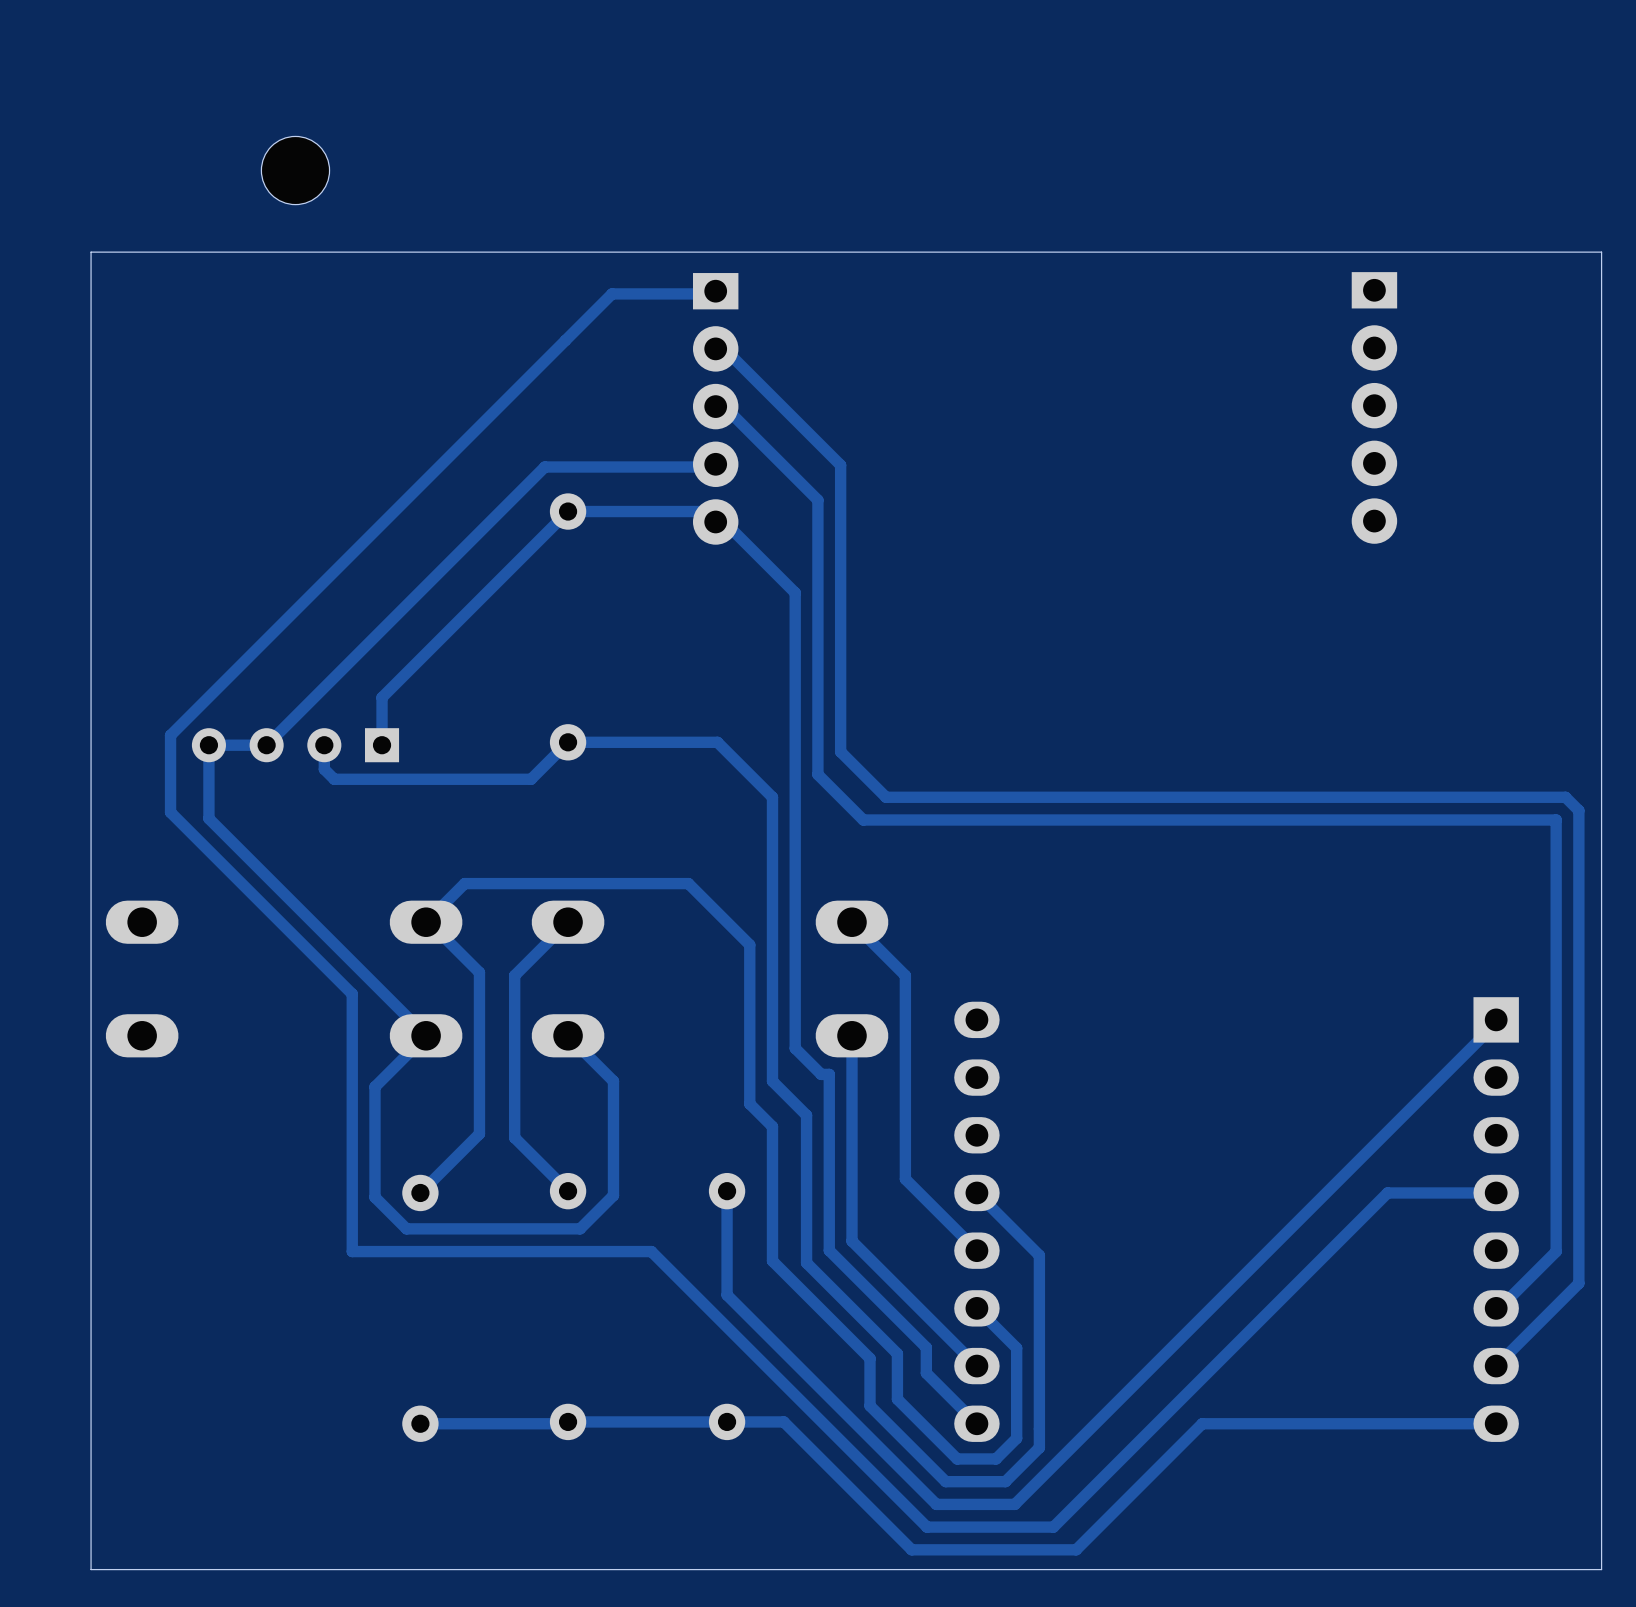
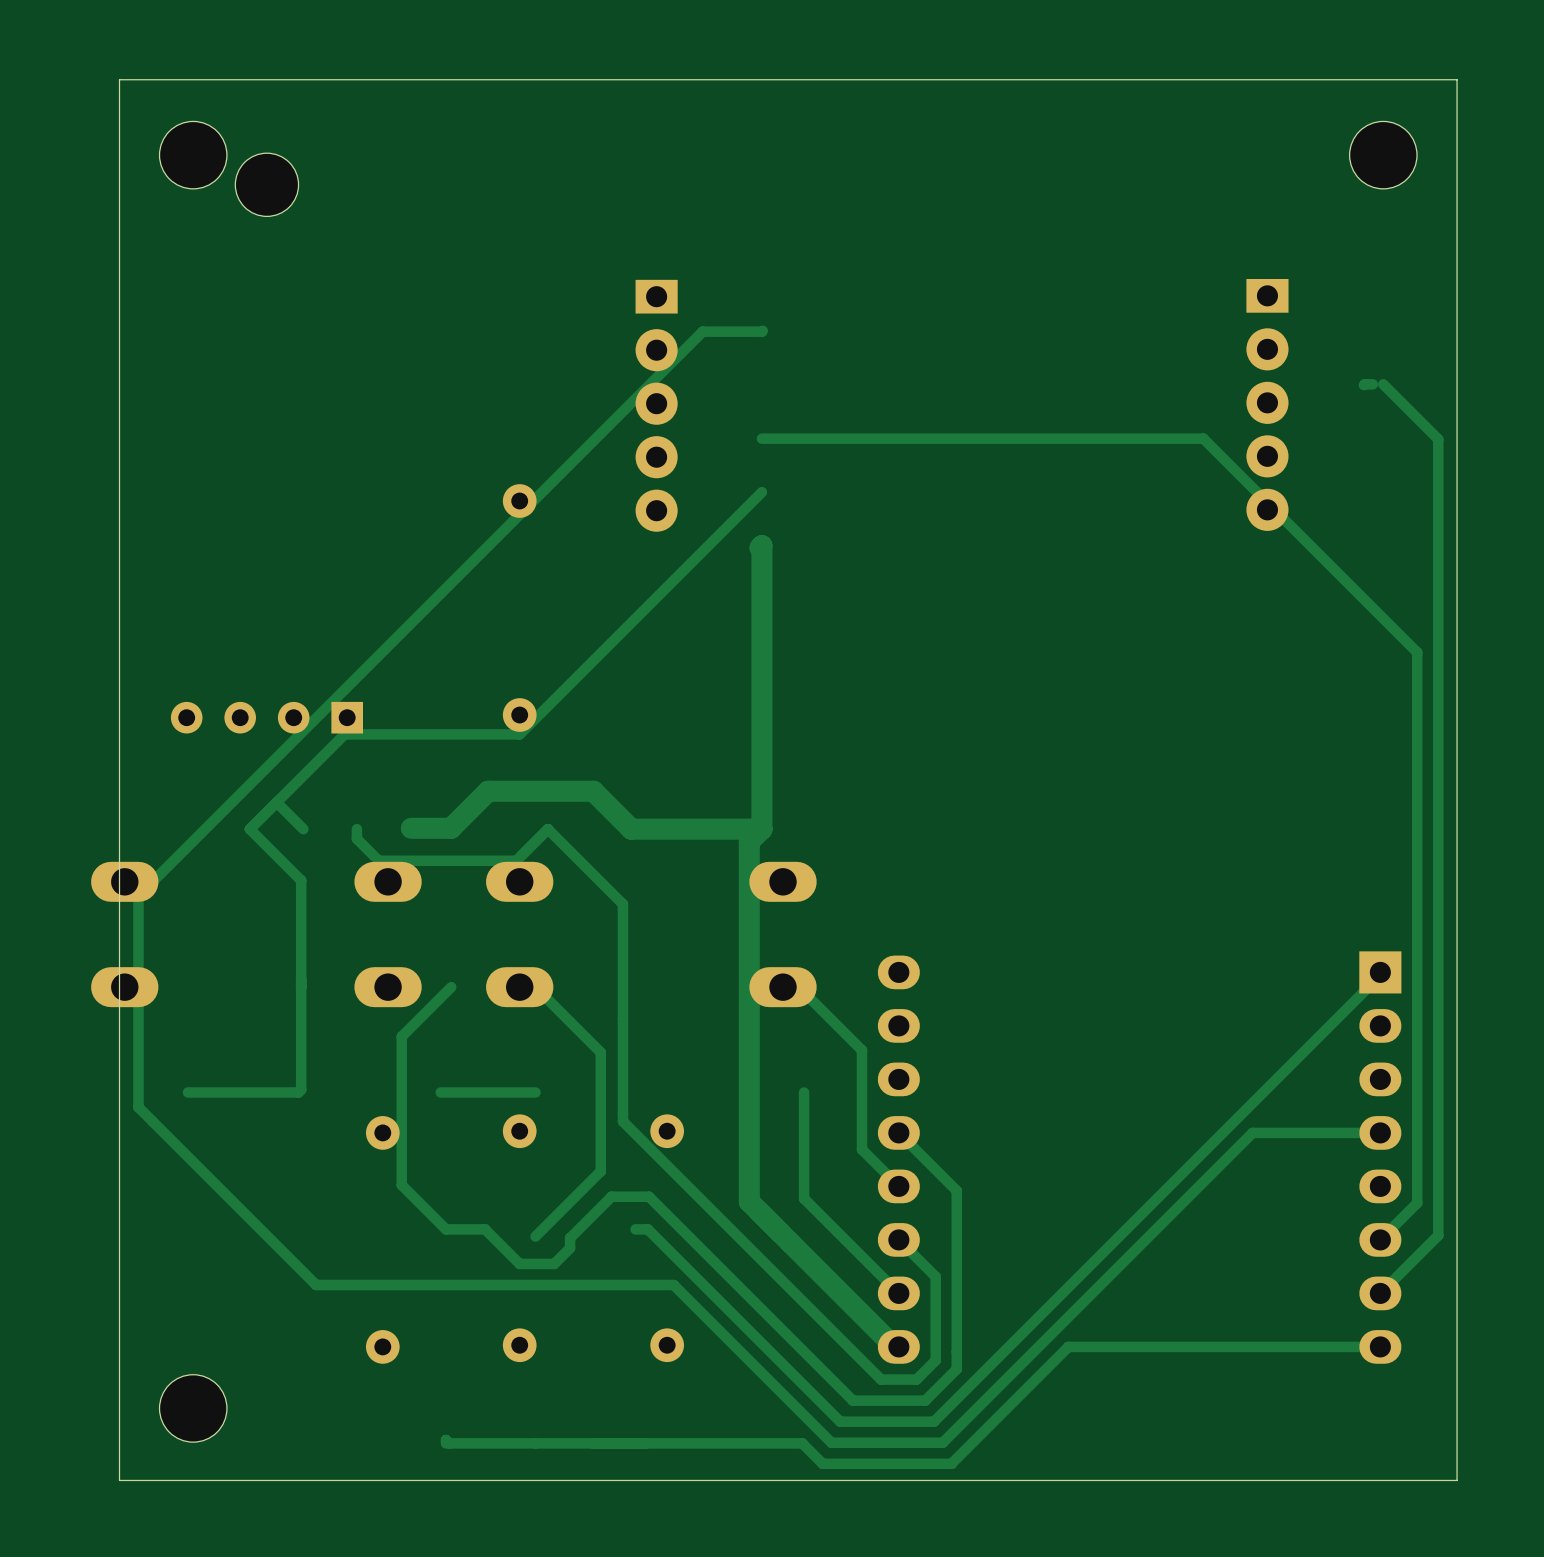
part: none -> (193, 155)
part: none -> (1383, 155)
board edge: (1601, 252) (91, 252) (91, 1569) (1601, 1569) (1601, 252) -> (1457, 79) (1457, 1480) (119, 1480) (119, 79) (1457, 79)
track: (727, 293) (612, 293) (170, 735) (170, 812) (352, 994) (352, 1251) (651, 1251) (926, 1527) -> (762, 330) (702, 331) (138, 895) (138, 1107) (316, 1285) (673, 1285) (831, 1442) (852, 1442)
track: (727, 351) (840, 465) (840, 751) (886, 797) (1565, 797) (1578, 810) (1578, 1283) (1558, 1303) -> (1383, 384) (1438, 439) (1438, 1235)
track: none -> (1372, 384) (1363, 385)
track: (727, 409) (817, 500) (817, 774) (863, 820) (1556, 820) (1556, 1251) (1499, 1308) -> none
track: none -> (761, 438) (1203, 438) (1417, 652) (1417, 1203) (1380, 1239)
track: (727, 467) (544, 467) (266, 745) (208, 745) (208, 818) (426, 1035) (374, 1086) (374, 1197) (406, 1228) (580, 1228) (613, 1195) (613, 1081) (568, 1035) -> none
track: none -> (761, 492) (519, 734) (344, 734) (249, 829) (301, 880) (301, 1089) (298, 1092) (187, 1092)
track: none -> (759, 547) (761, 545) (761, 829)
track: (324, 745) (324, 769) (334, 779) (531, 779) (568, 742) (717, 742) (772, 797) (772, 1081) (806, 1115) (806, 1262) (897, 1353) (897, 1399) (957, 1458) -> (356, 829) (356, 838) (378, 860) (516, 860) (547, 829) (622, 904) (622, 1121) (881, 1379)
track: (382, 745) (382, 697) (568, 511) (713, 511) (795, 592) (795, 1048) (821, 1074) (829, 1074) (829, 1250) (926, 1347) (926, 1373) (976, 1423) -> none
track: none -> (277, 801) (303, 829)
track: none -> (411, 828) (451, 828) (488, 791) (593, 791) (631, 829) (761, 829)
track: none -> (761, 829) (749, 841) (749, 1201) (894, 1346) (898, 1346) (898, 1345)
track: (568, 922) (514, 975) (514, 1137) (568, 1191) -> none
track: (851, 935) (851, 922) (905, 975) (905, 1179) (937, 1210) -> (798, 987) (861, 1050) (861, 1149)
track: none -> (535, 987) (600, 1052) (600, 1171) (535, 1236)
track: (851, 1035) (851, 1241) (874, 1263) -> (804, 1092) (804, 1198)
track: none -> (535, 1092) (440, 1092)
track: (420, 1192) (479, 1133) (479, 972) (429, 922) (426, 922) (464, 883) (688, 883) (749, 944) (749, 1103) (772, 1126) (772, 1260) (870, 1358) (870, 1405) (945, 1481) -> (451, 987) (401, 1036) (401, 1185) (445, 1229) (485, 1229) (519, 1263) (554, 1263) (570, 1248) (570, 1238) (611, 1196) (649, 1196) (852, 1400) (870, 1400)
track: (727, 1192) (727, 1295) (936, 1504) -> (635, 1229) (647, 1229) (840, 1421) (861, 1421)
track: (1387, 1192) (1053, 1527) (1024, 1527) -> (1279, 1132) (1252, 1132) (942, 1442)
track: (420, 1423) (783, 1421) (911, 1549) -> (445, 1443) (445, 1440) (449, 1443) (802, 1443) (822, 1463) (838, 1463)
track: (1202, 1423) (1076, 1549) (1033, 1549) -> (1107, 1346) (1068, 1346) (951, 1463)
part: none -> (193, 1408)

